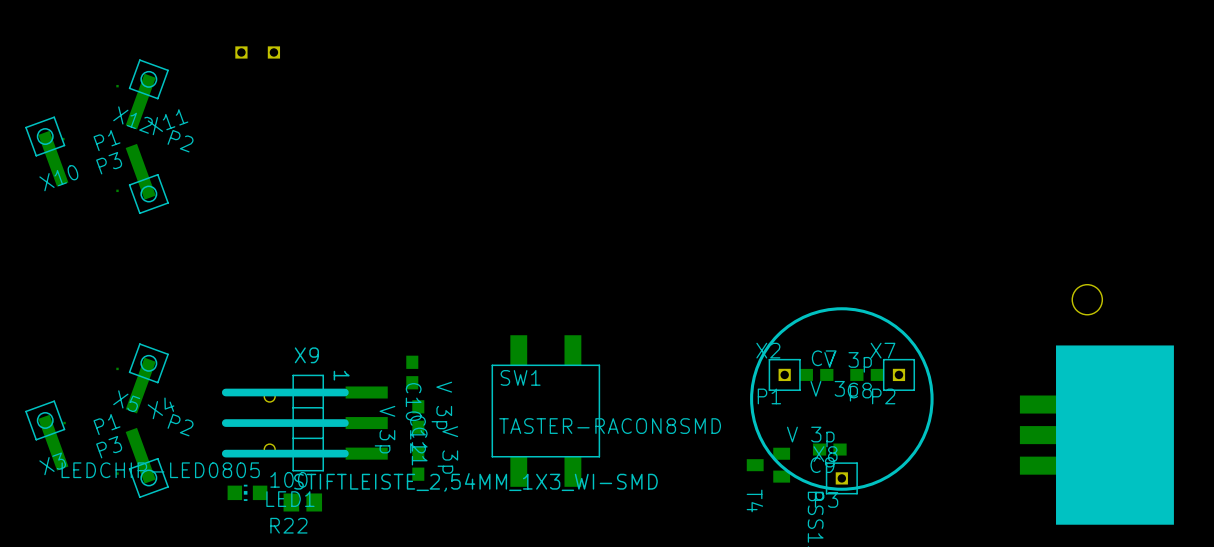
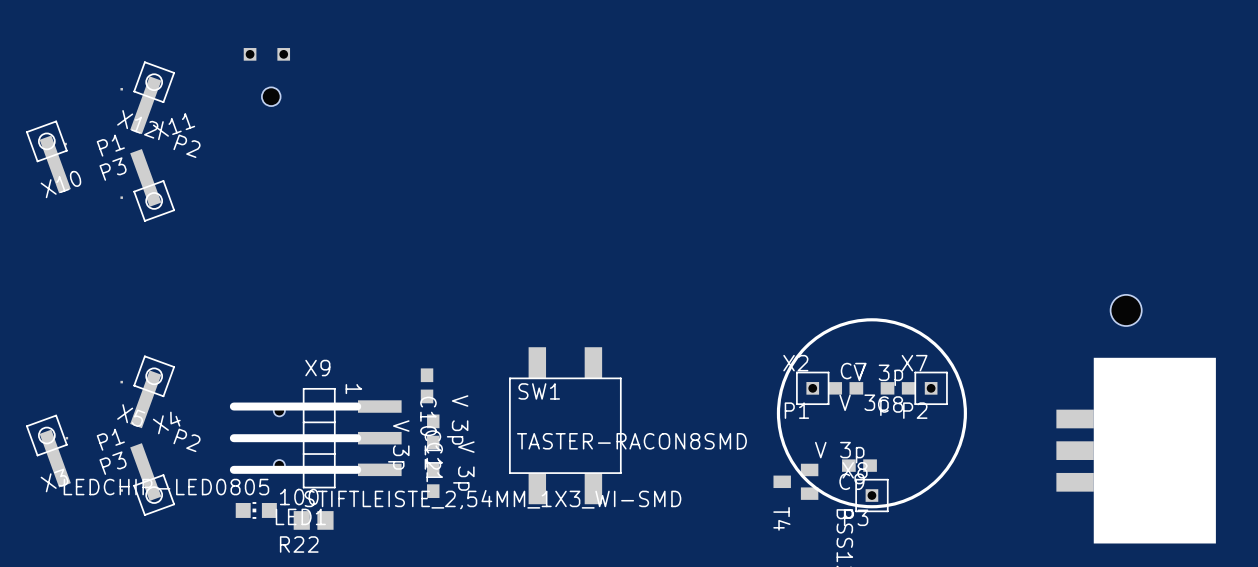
part: none -> (271, 96)

